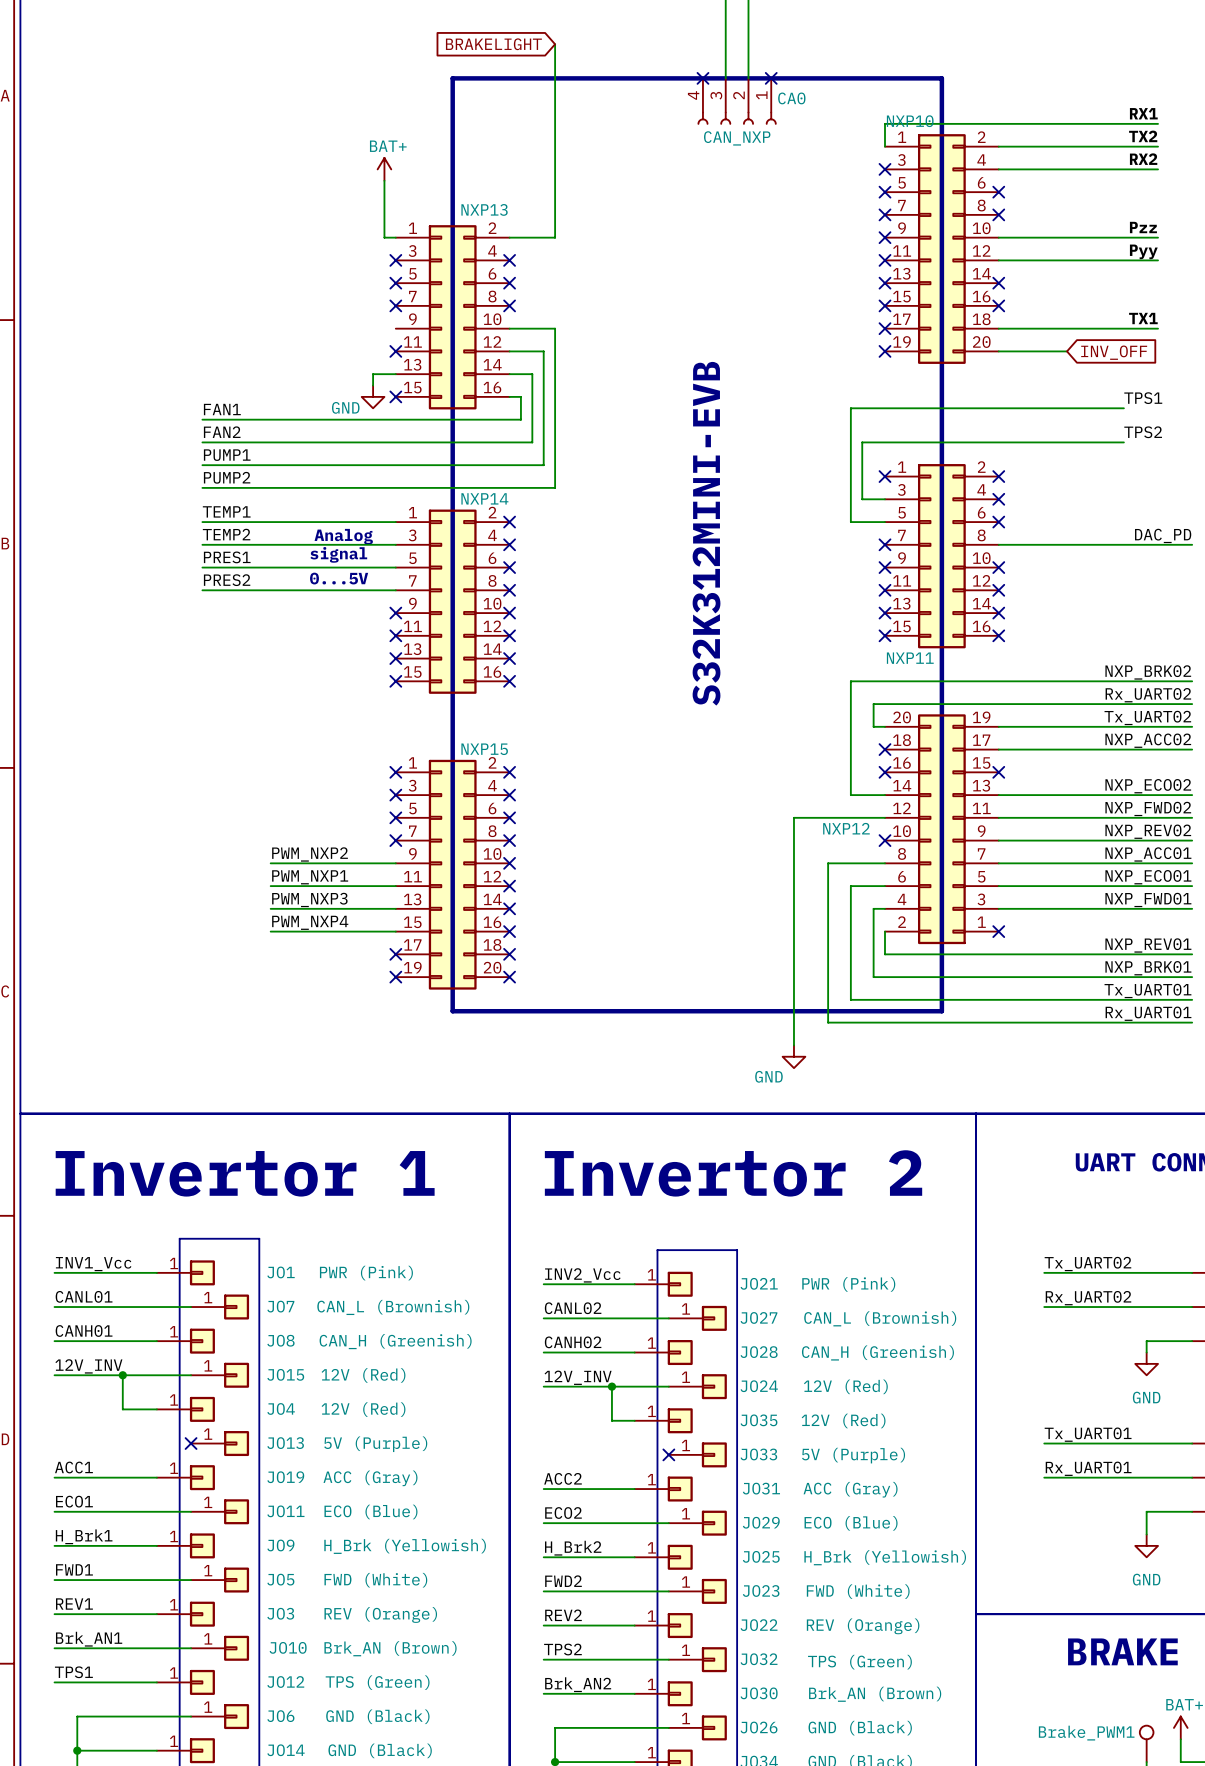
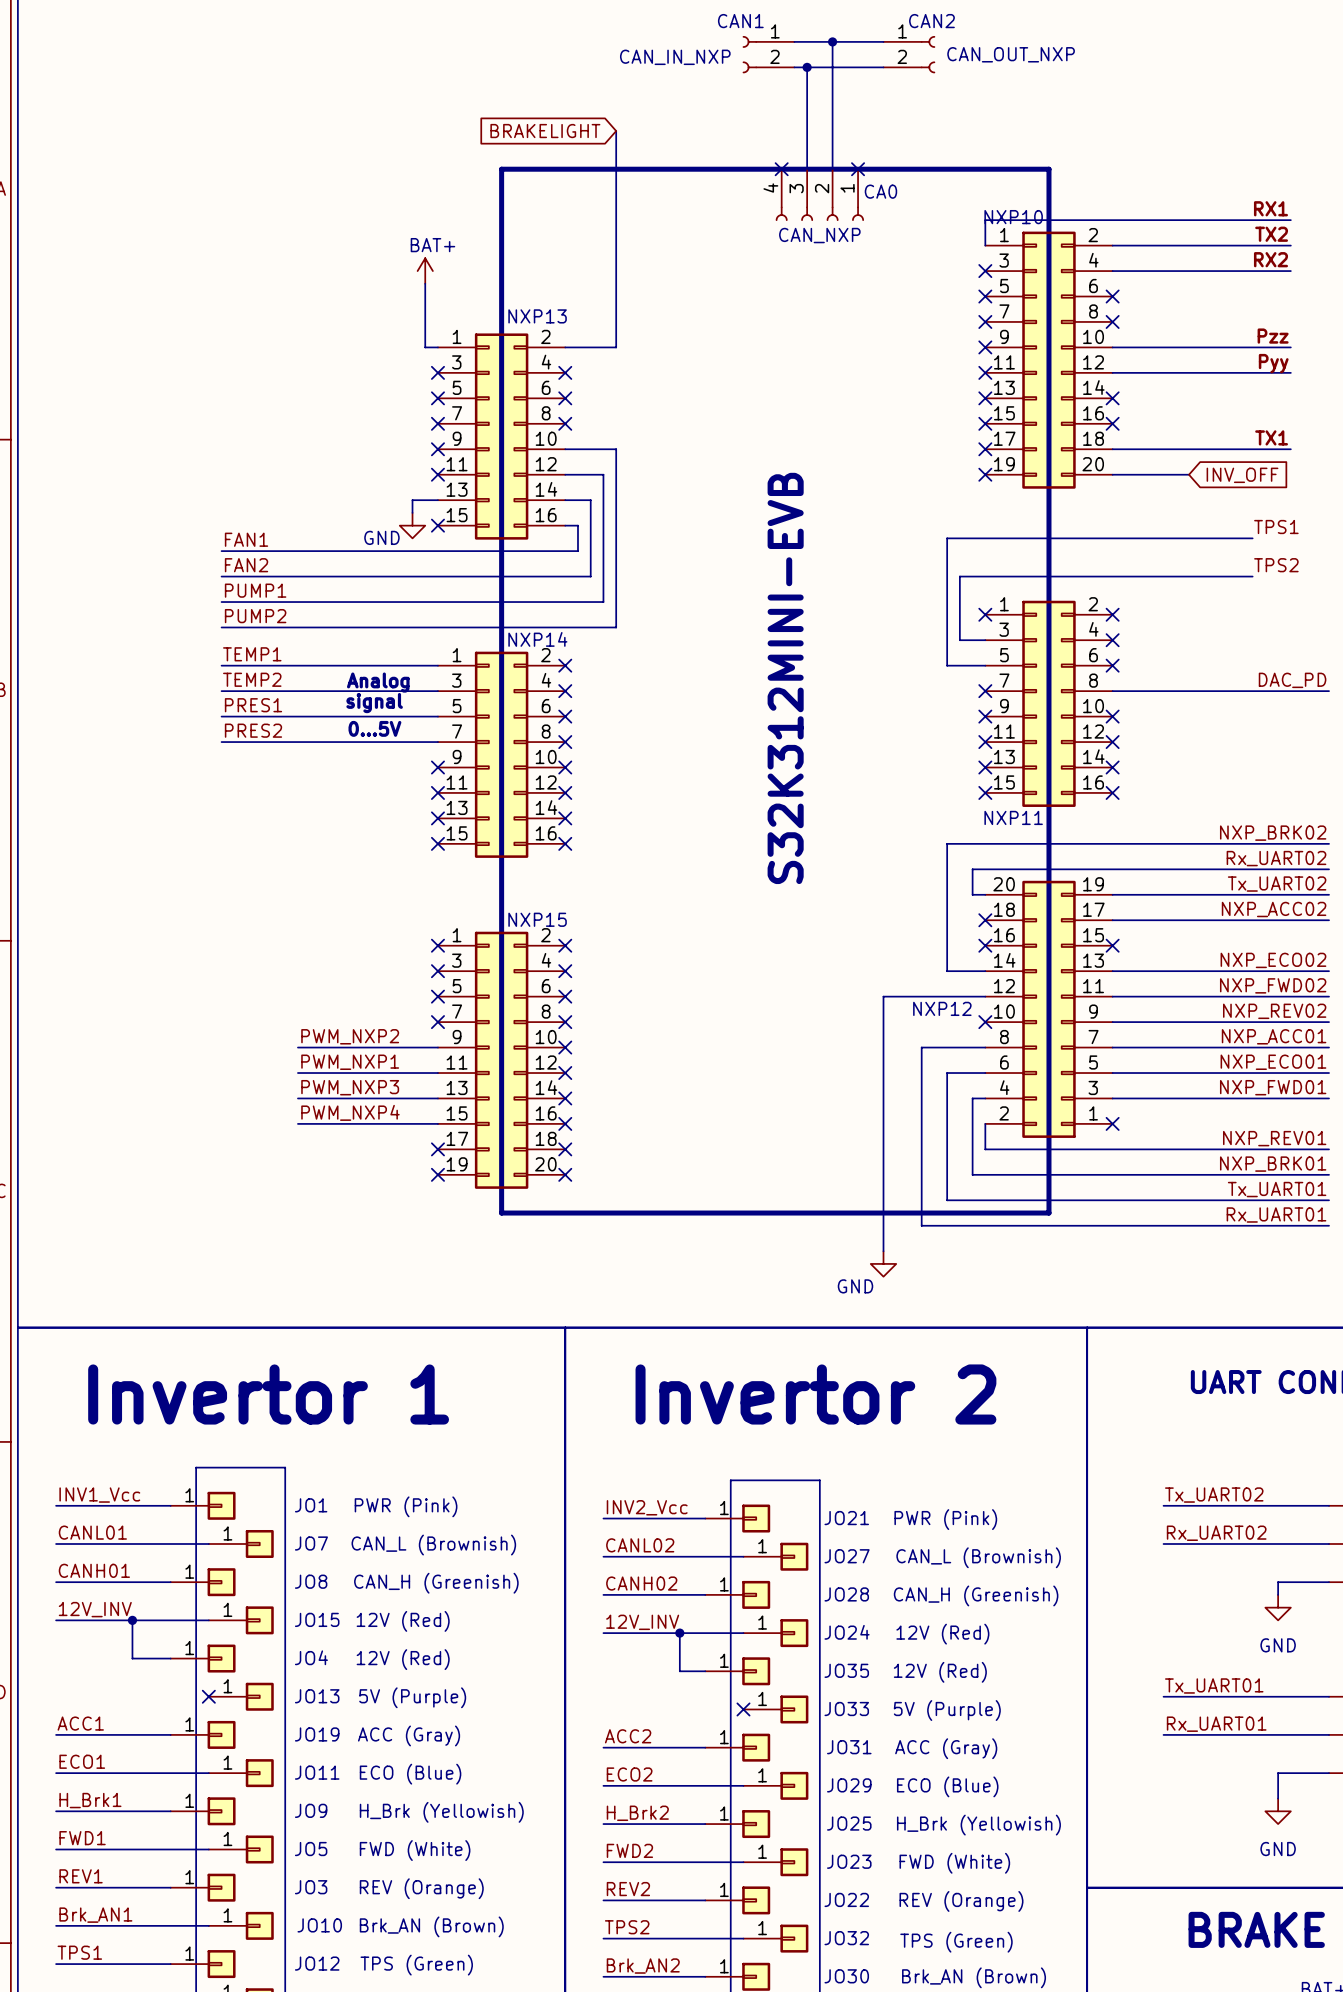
no-connect mark: none -> (437, 449)

